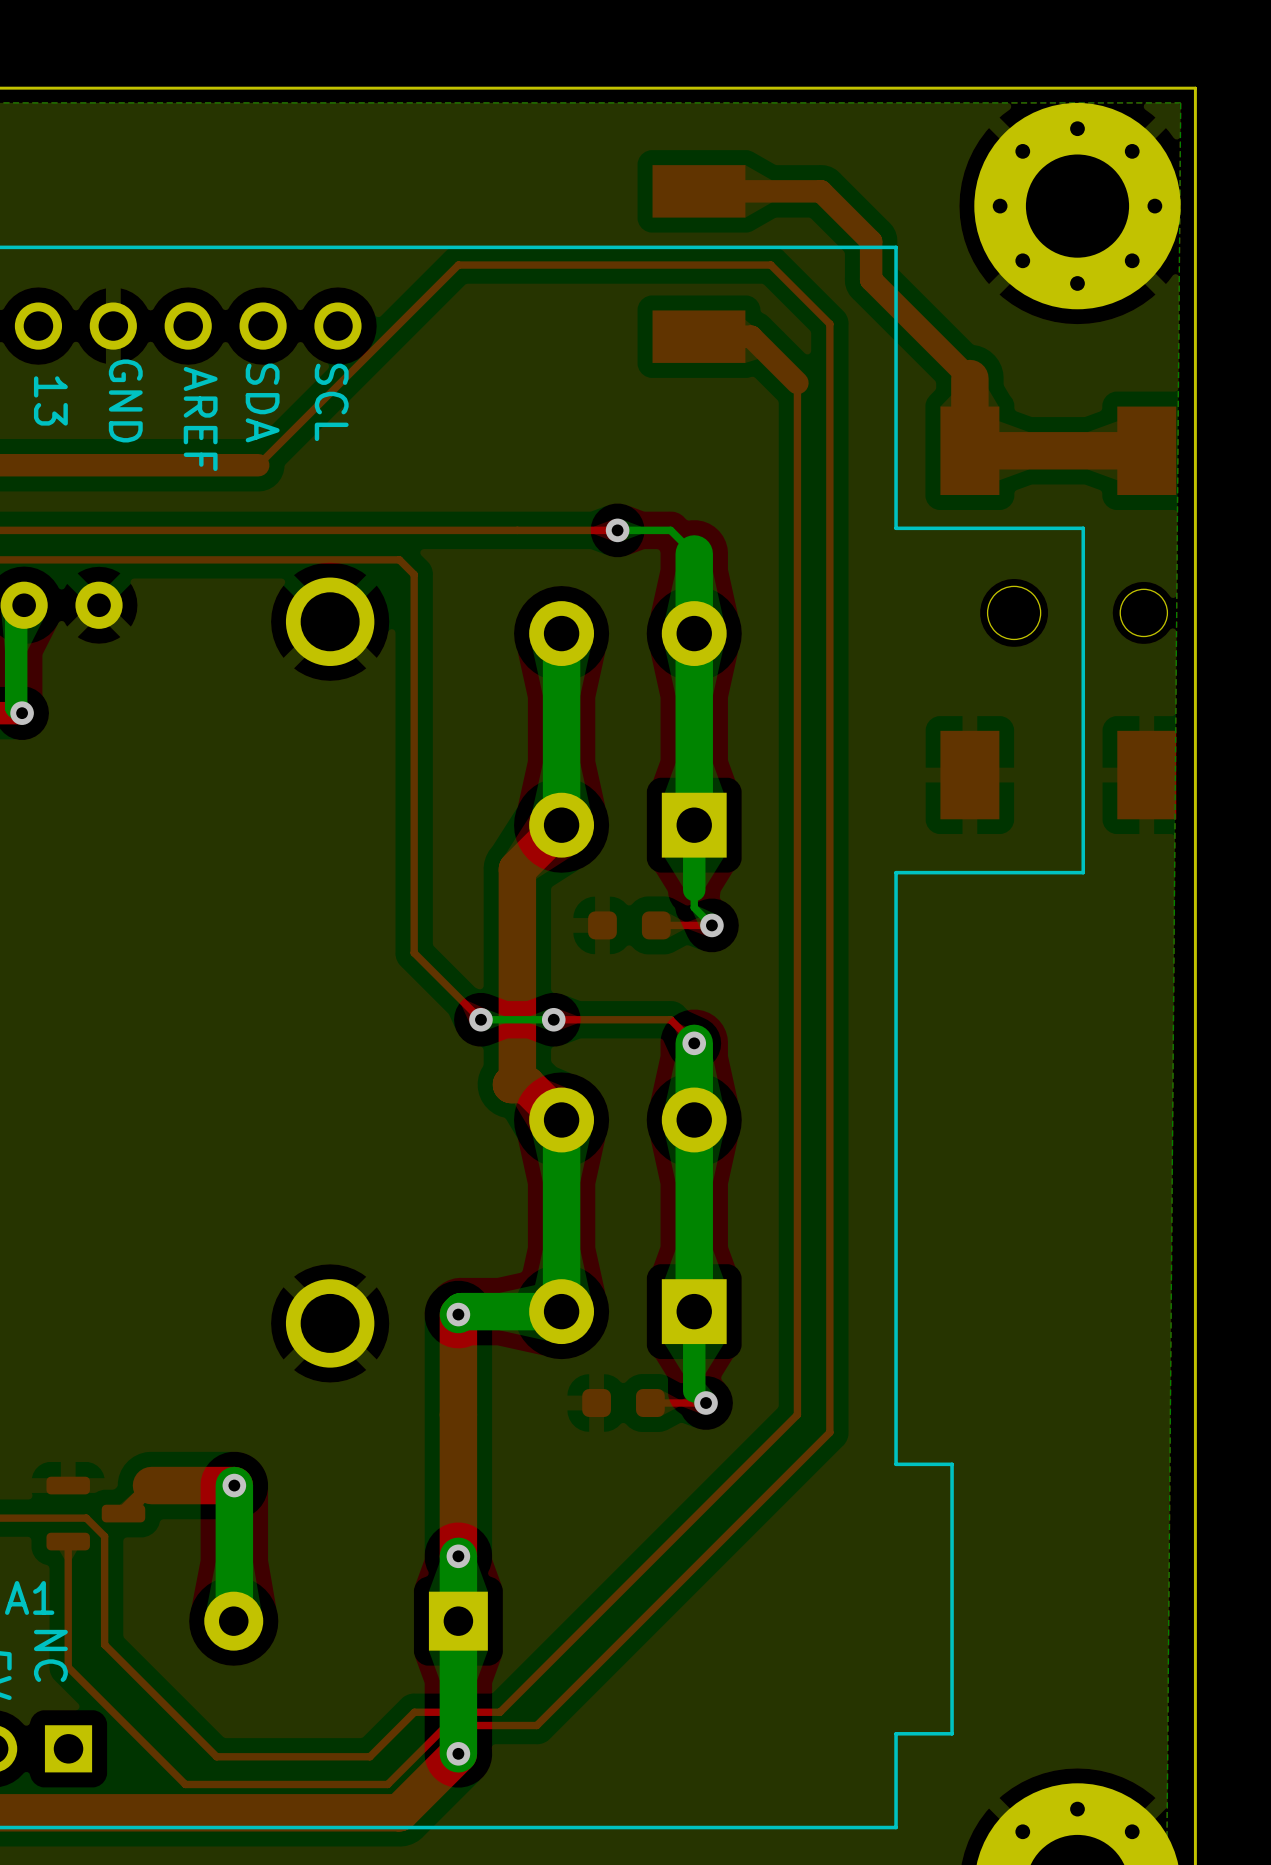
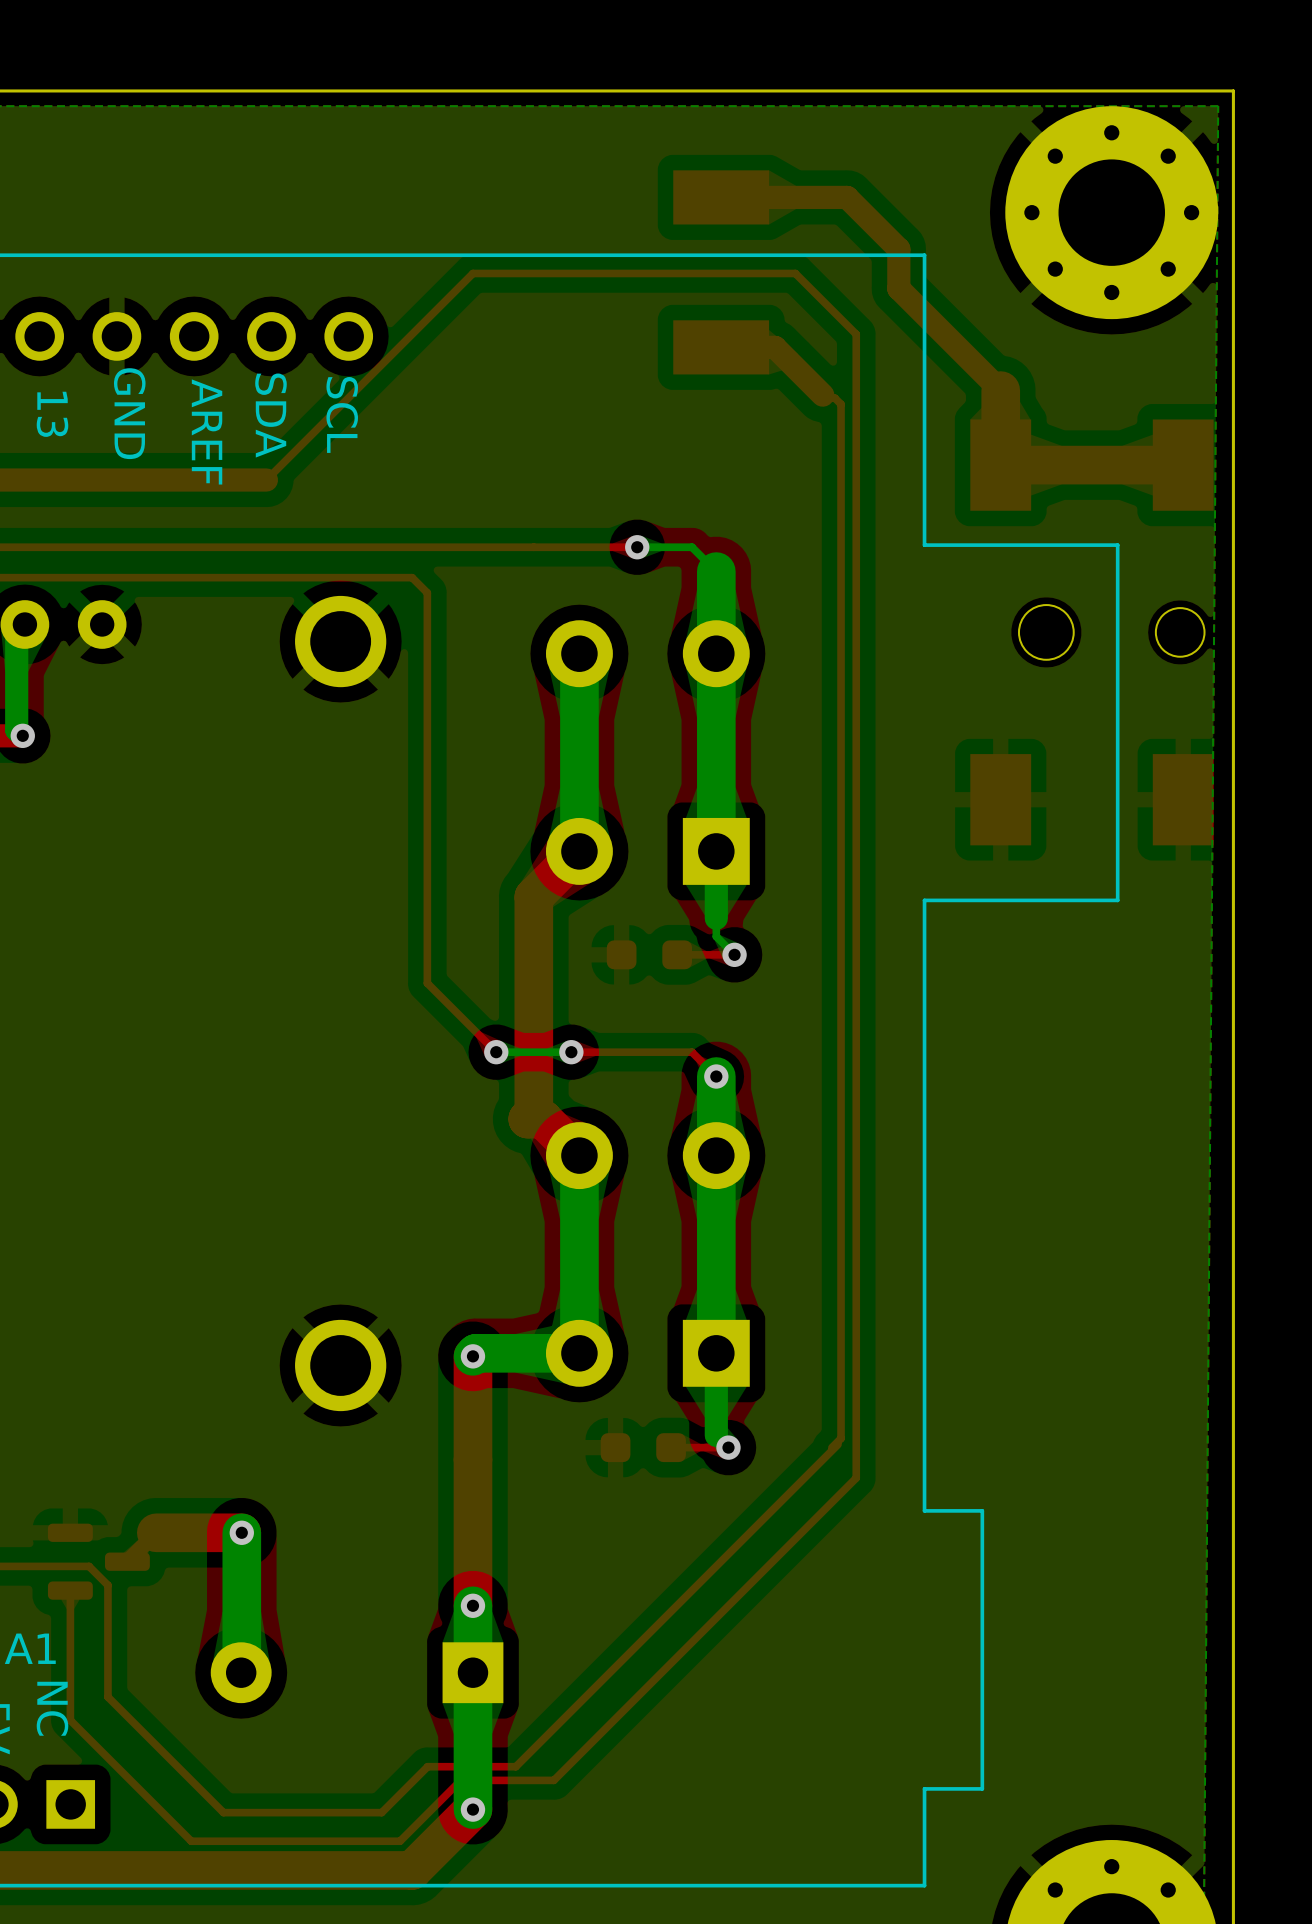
top track: (797, 382) (797, 1414) -> (837, 1444) (822, 1459)
top track: none -> (825, 398) (834, 398) (841, 404) (841, 1438) (831, 1447)

